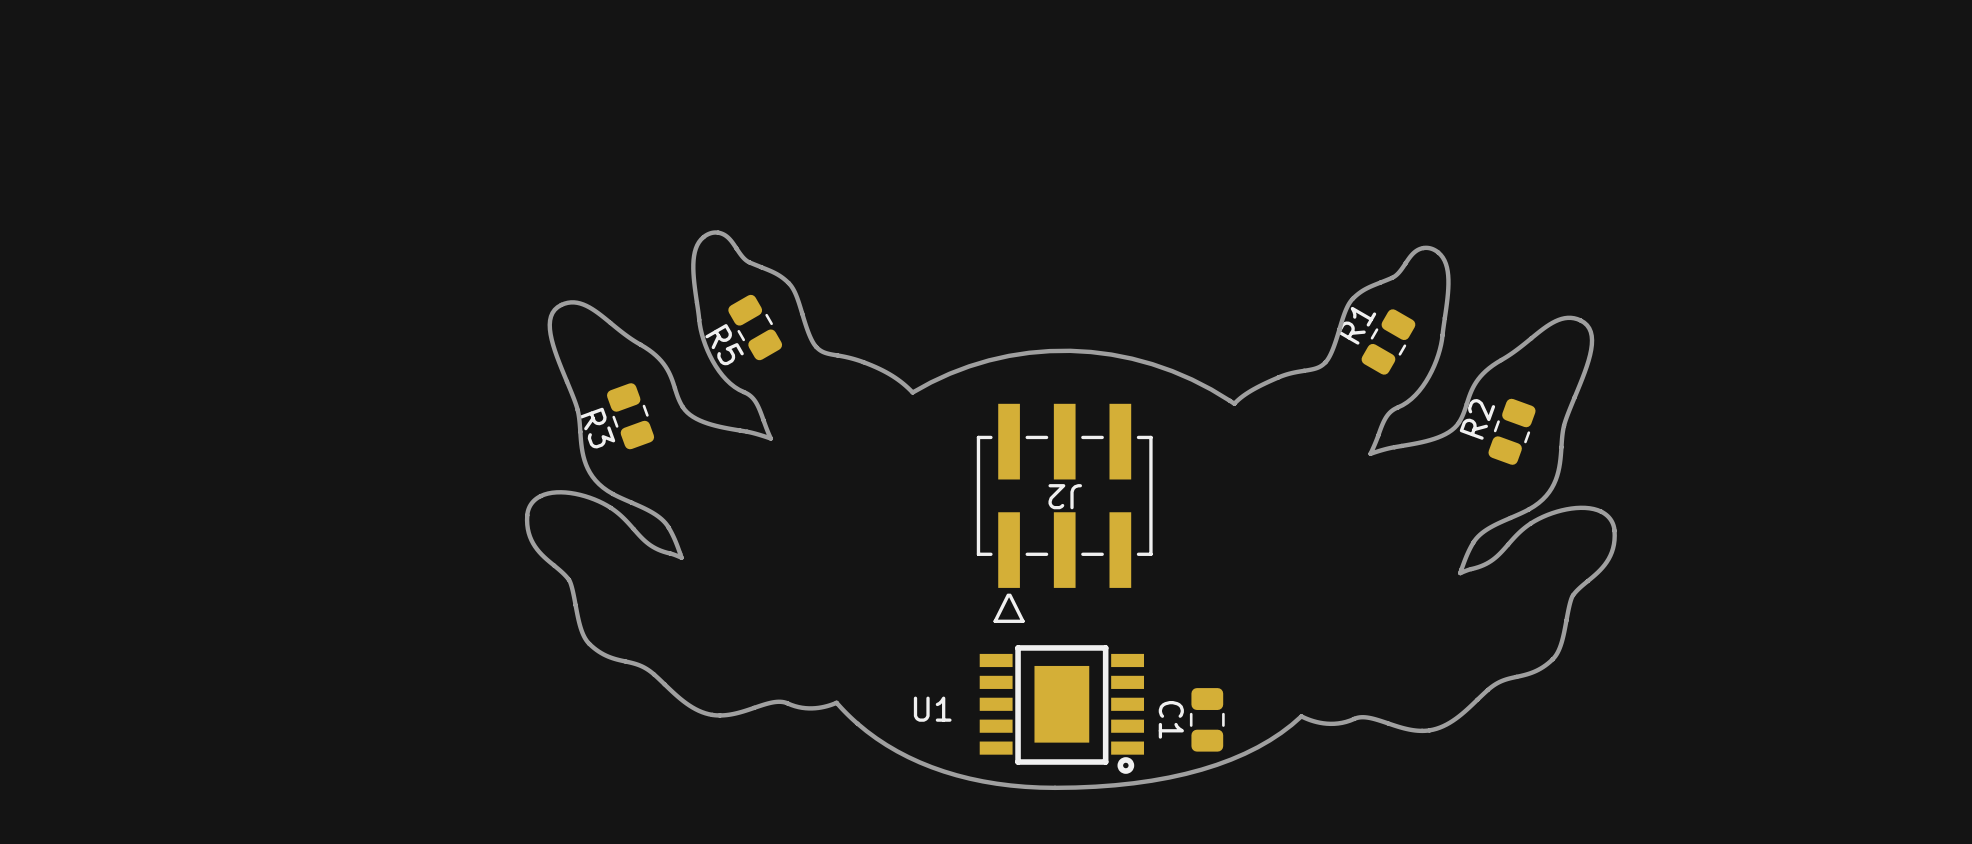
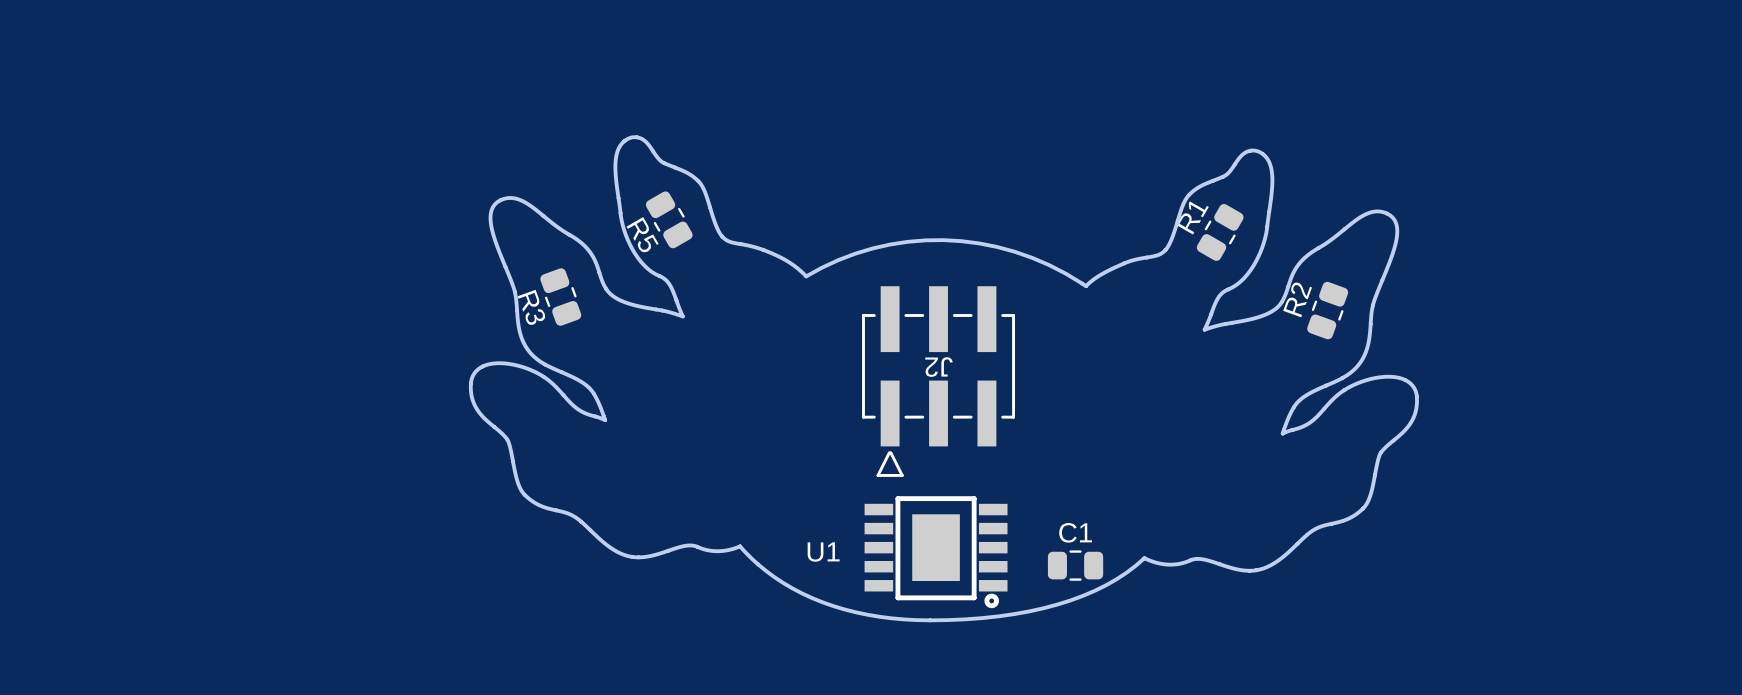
C1 rotation: 0° (1207, 719) -> 90° clockwise (1075, 565)

